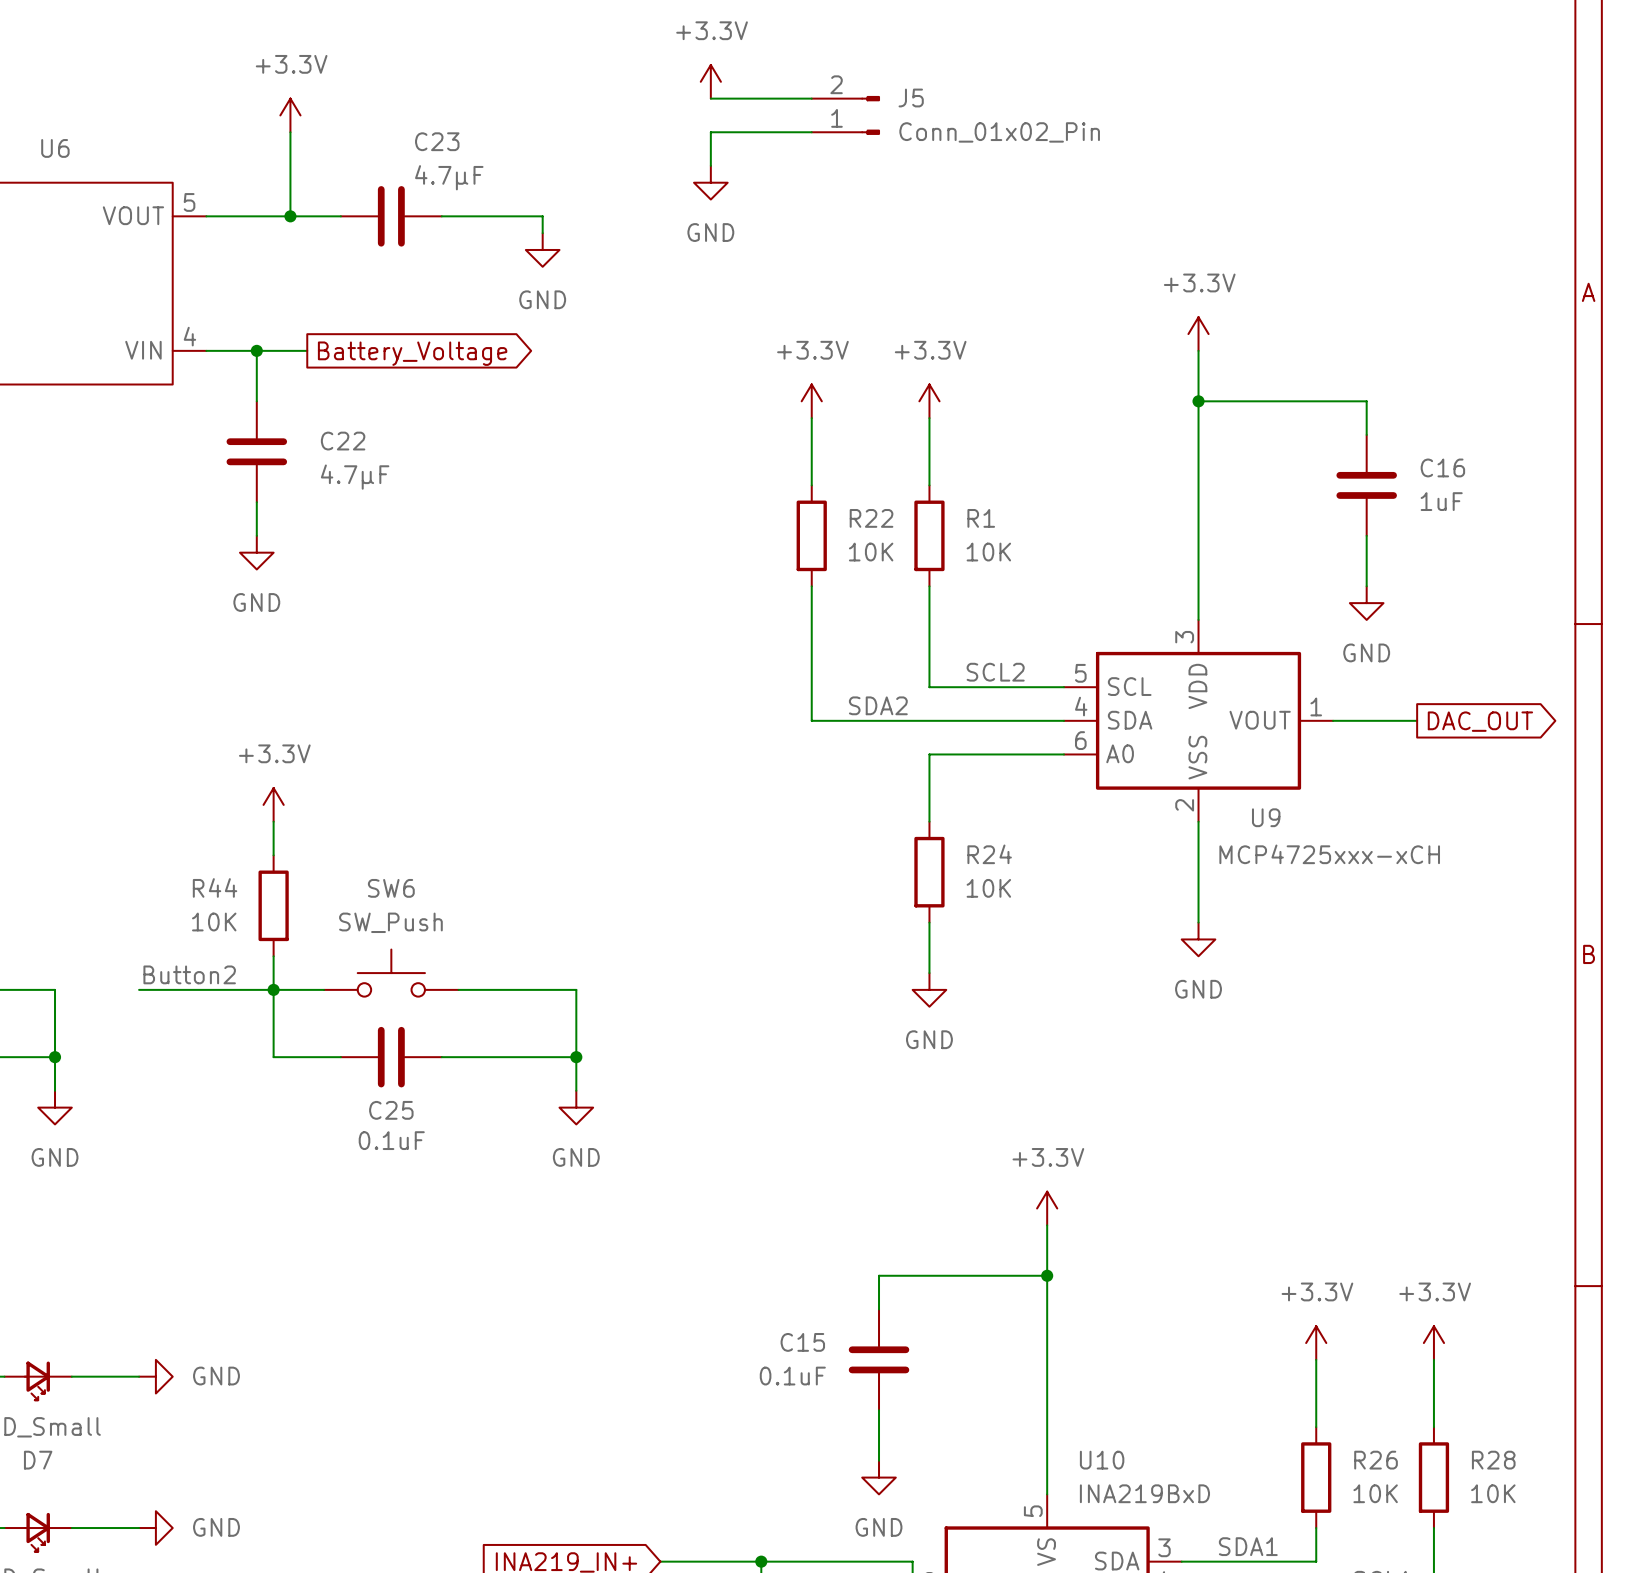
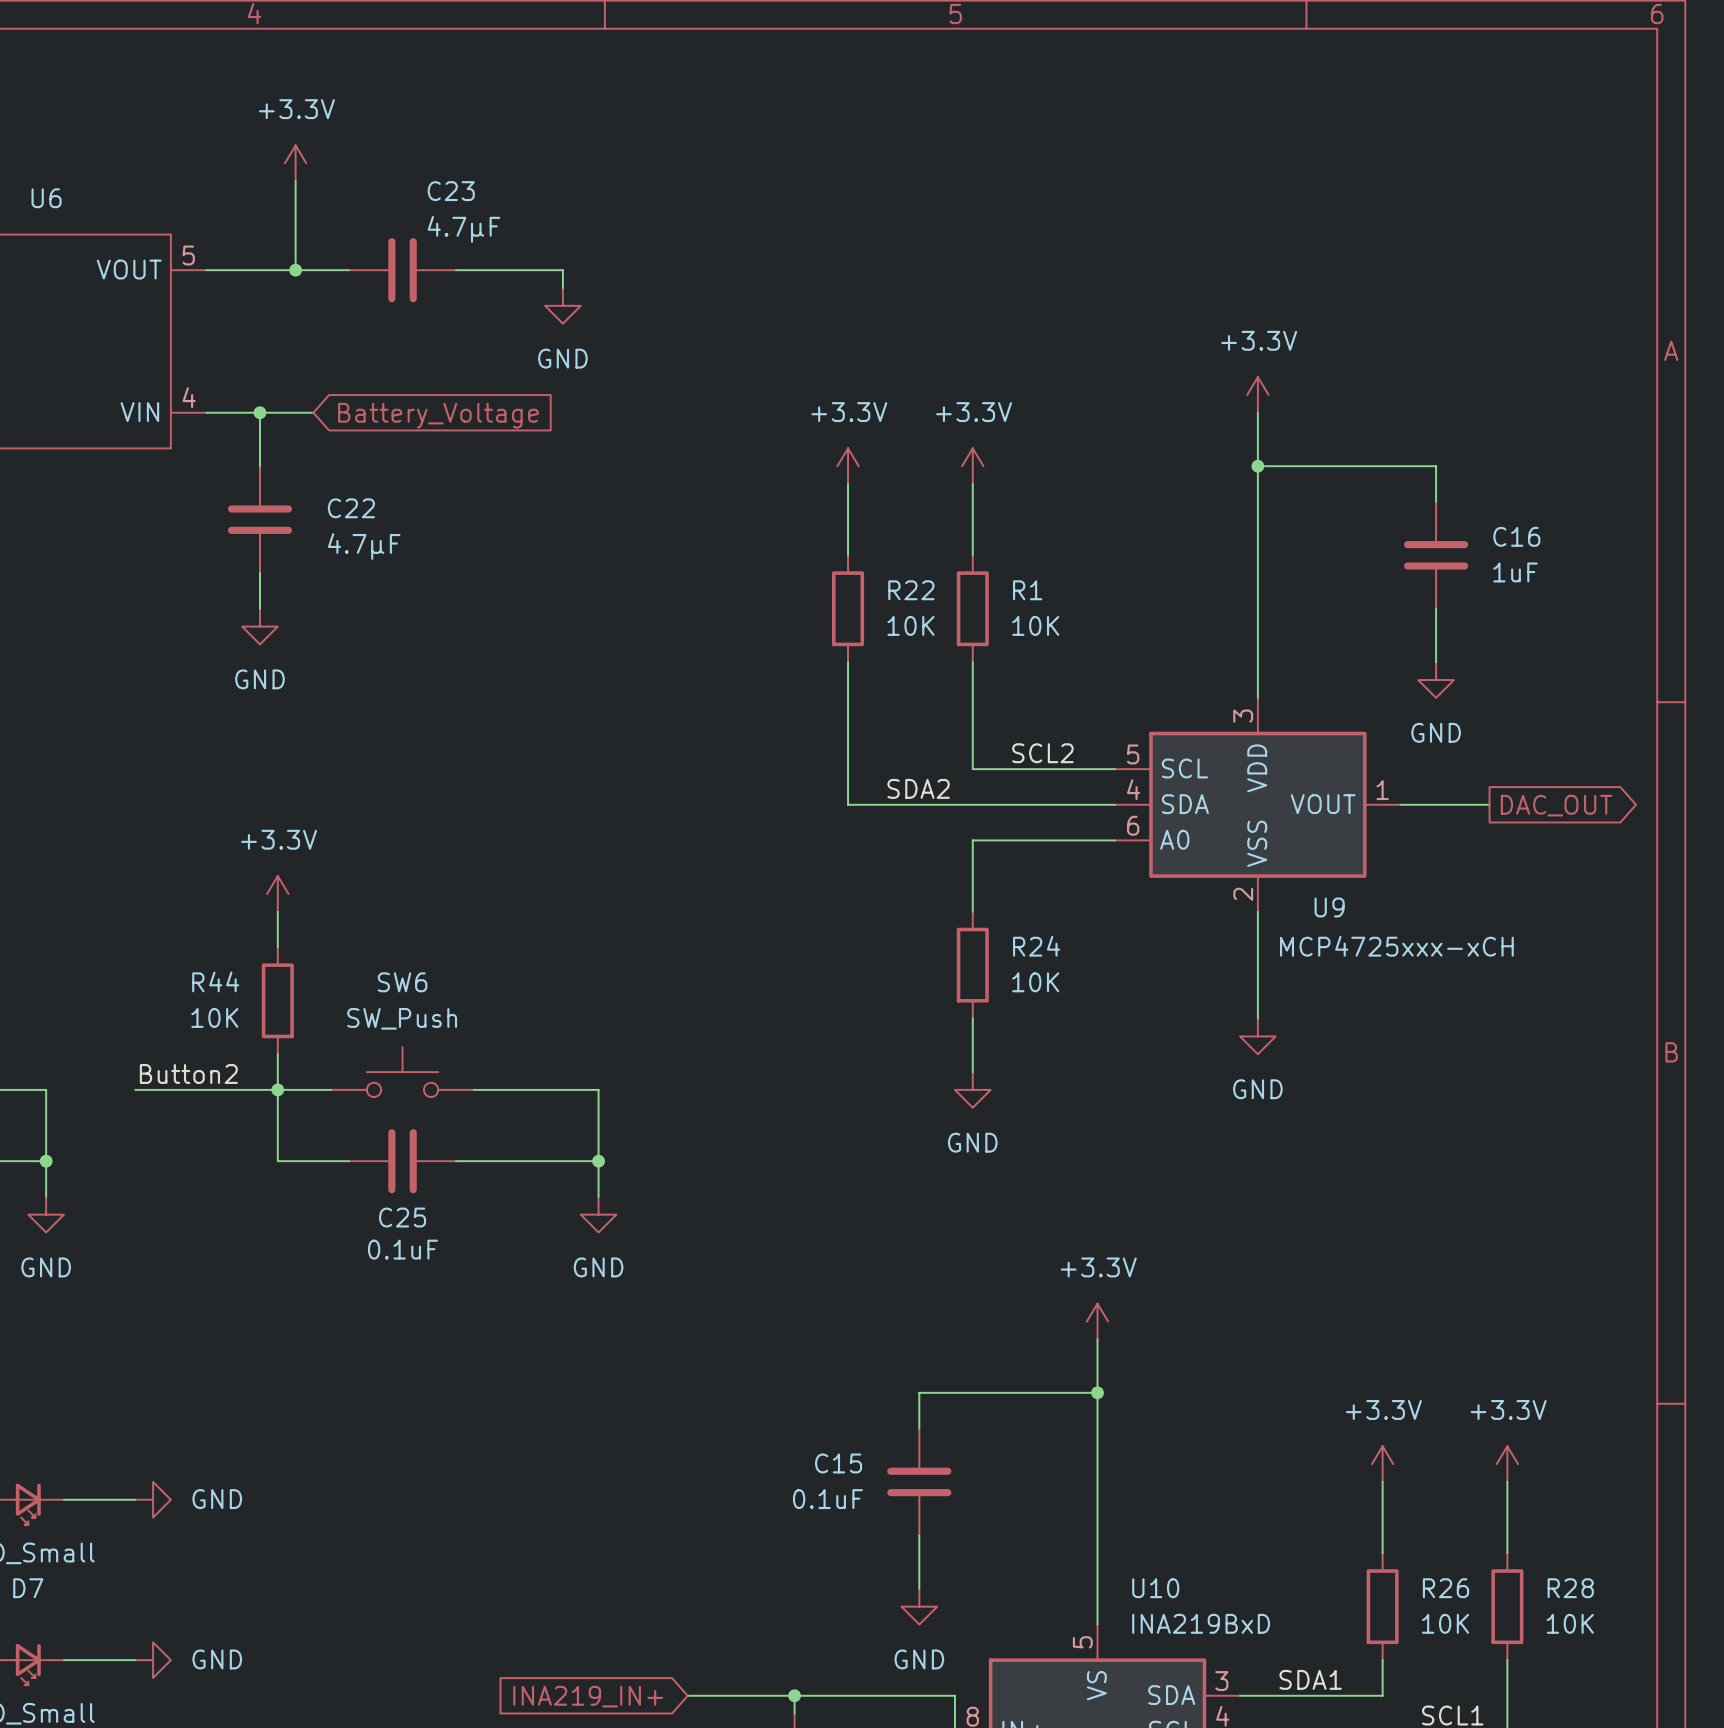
power symbol: +3.3V (710, 81) -> none
wire: (710, 98) (811, 98) -> none
J5: Conn_01x02_Pin (845, 115) -> none
wire: (811, 132) (710, 132) (710, 165) -> none
power symbol: GND (710, 182) -> none
global label shape: output (412, 353) -> input (438, 415)

